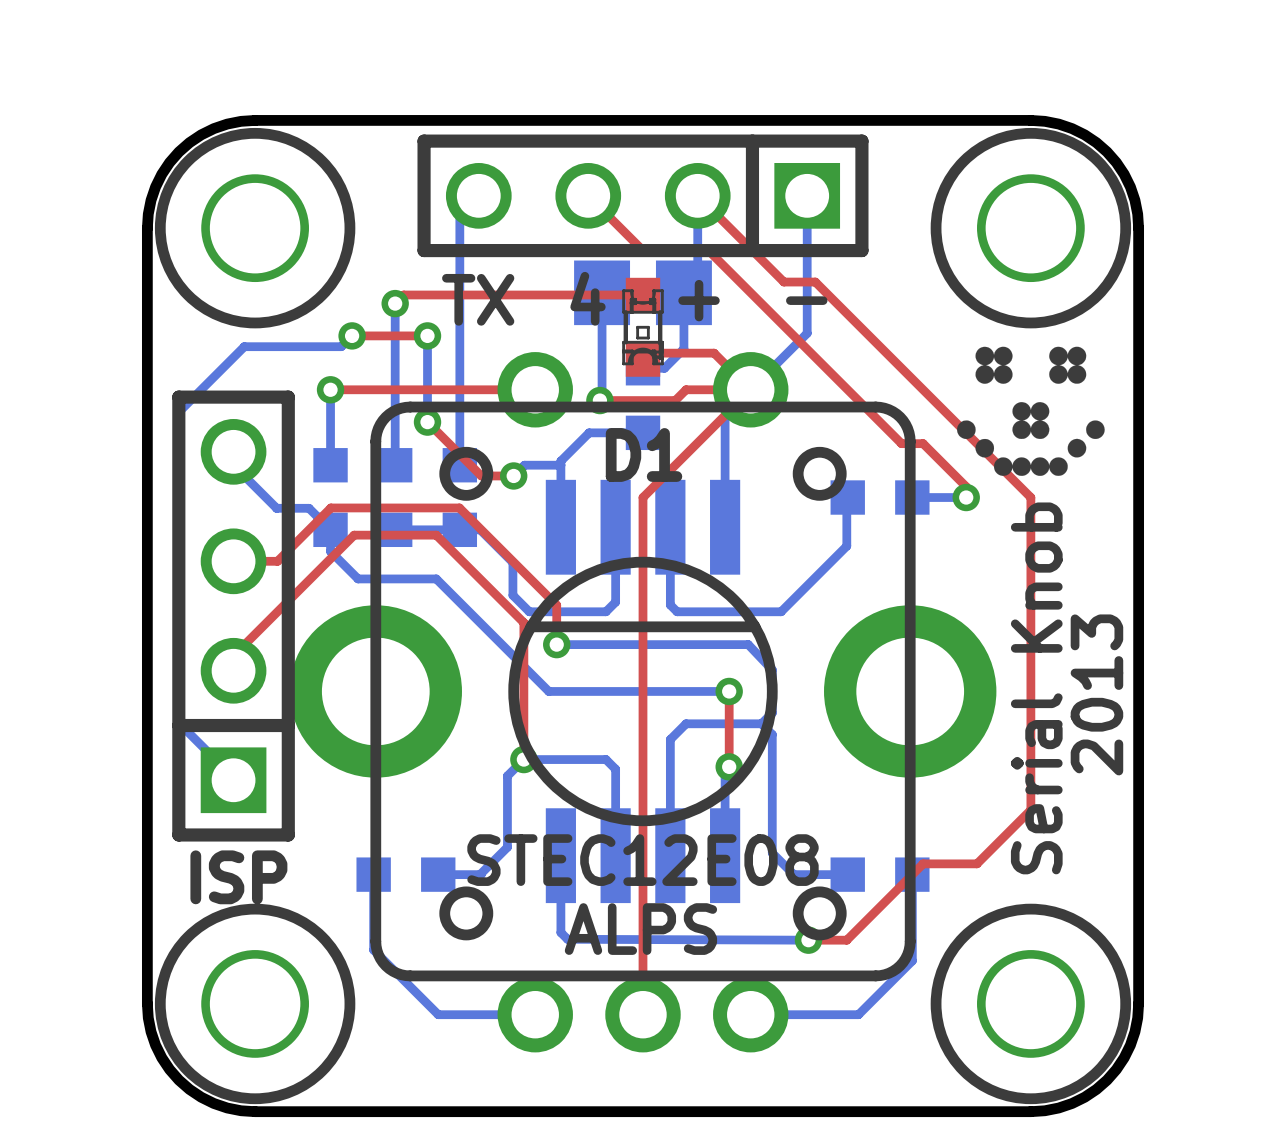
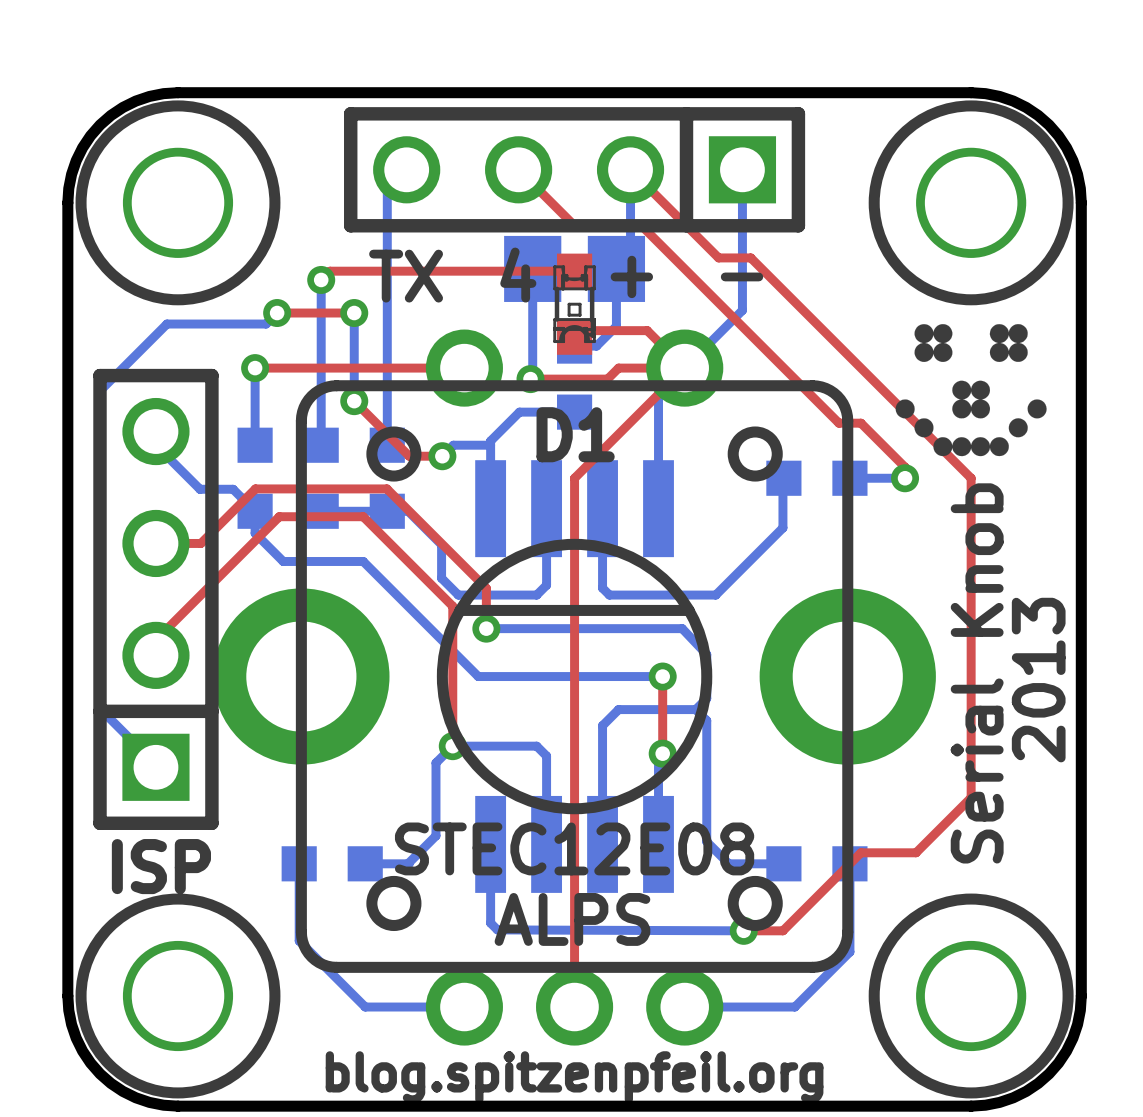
text: none -> blog.spitzenpfeil.org (574, 1077)

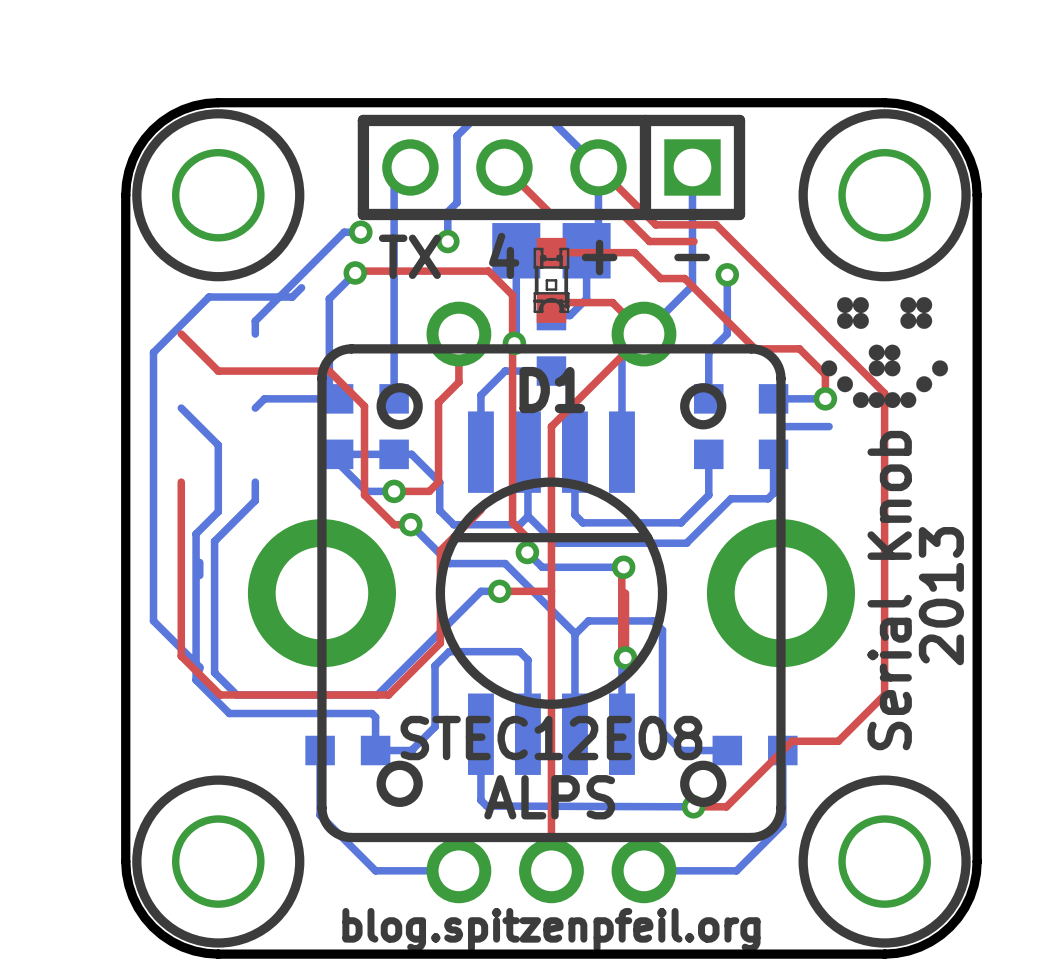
bottom track: none -> (598, 167) (550, 119) (473, 119) (457, 136) (457, 202) (447, 211) (447, 241)
top track: (640, 224) (838, 423) (860, 423) (905, 467) (905, 478) -> none
top track: (698, 238) (718, 257) -> (606, 213) (621, 213) (649, 241) (672, 241)
bottom track: none -> (360, 232) (344, 232) (255, 321) (255, 334)
via: none -> (360, 232)
via: none -> (447, 241)
top track: (744, 257) (750, 257) (971, 478) -> (655, 224) (716, 224) (884, 393) (884, 426)
top track: (574, 271) (329, 271) (321, 279) -> (551, 252) (634, 252) (660, 278) (684, 278) (755, 348) (799, 348) (825, 374) (825, 398)
bottom track: (321, 279) (321, 445) -> none
via: (321, 279) -> none
bottom track: none -> (355, 272) (329, 298) (329, 398) (264, 398) (255, 408)
top track: none -> (355, 272) (357, 271) (488, 271) (512, 295) (512, 522) (527, 537) (527, 552)
via: none -> (355, 272)
bottom track: none -> (727, 274) (727, 334) (708, 352) (708, 398)
via: none -> (727, 274)
top track: (277, 313) (354, 313) -> none
via: (277, 313) -> none
bottom track: (354, 313) (354, 401) -> none
via: (354, 313) -> none
top track: none -> (181, 334) (218, 371) (329, 371) (364, 406) (364, 495) (394, 524) (410, 524)
bottom track: (255, 368) (255, 445) -> none
top track: (255, 368) (464, 368) -> (394, 491) (429, 491) (438, 482) (438, 402) (458, 382) (458, 334)
via: (255, 368) -> none
top track: (684, 368) (618, 368) (607, 379) (530, 379) -> none
top track: (354, 401) (409, 456) (442, 456) -> none
via: (354, 401) -> none
bottom track: (155, 431) (155, 445) (200, 489) (233, 489) (255, 511) (255, 533) (283, 561) (363, 561) (478, 676) (662, 676) -> none
bottom track: (490, 445) (453, 445) (442, 456) -> none
bottom track: none -> (773, 398) (825, 398)
bottom track: none -> (181, 408) (218, 445) (218, 511) (196, 533) (196, 680) (229, 713) (371, 713) (375, 717) (375, 750)
via: (442, 456) -> none
part position: (255, 478) -> (708, 426)
bottom track: (783, 478) (782, 527) (715, 595) (609, 595) (602, 588) (602, 583) -> (708, 454) (708, 495) (681, 522) (582, 522) (574, 514)
part rotation: 0° (816, 478) -> 90° clockwise (773, 426)
via position: (905, 478) -> (825, 398)
bottom track: none -> (329, 454) (366, 491) (394, 491)
bottom track: none -> (773, 454) (773, 493) (768, 498) (730, 498) (686, 543) (555, 543) (528, 516)
top track: (155, 543) (200, 543) (255, 488) (386, 488) (486, 588) (486, 628) -> none
top track: none -> (181, 482) (181, 656) (220, 694) (388, 694) (440, 643) (440, 550) (481, 509)
bottom track: none -> (255, 482) (255, 500) (214, 541) (214, 672) (236, 694) (377, 694) (481, 591) (499, 591)
via: none -> (394, 491)
bottom track: none -> (410, 524) (449, 563) (505, 563) (574, 634)
via: none -> (410, 524)
part: ISP (155, 599) -> none
bottom track: (486, 628) (682, 628) (706, 654) (706, 698) (695, 709) -> none
via: (486, 628) -> none
bottom track: none -> (527, 552) (542, 567) (623, 567)
via: none -> (527, 552)
top track: none -> (623, 567) (621, 569) (621, 657)
top track: (155, 655) (155, 640) (279, 516) (363, 516) (452, 606) (452, 746) -> none
top track: none -> (499, 591) (551, 591)
via: none -> (499, 591)
via position: (662, 676) -> (623, 567)
via: (452, 746) -> none

